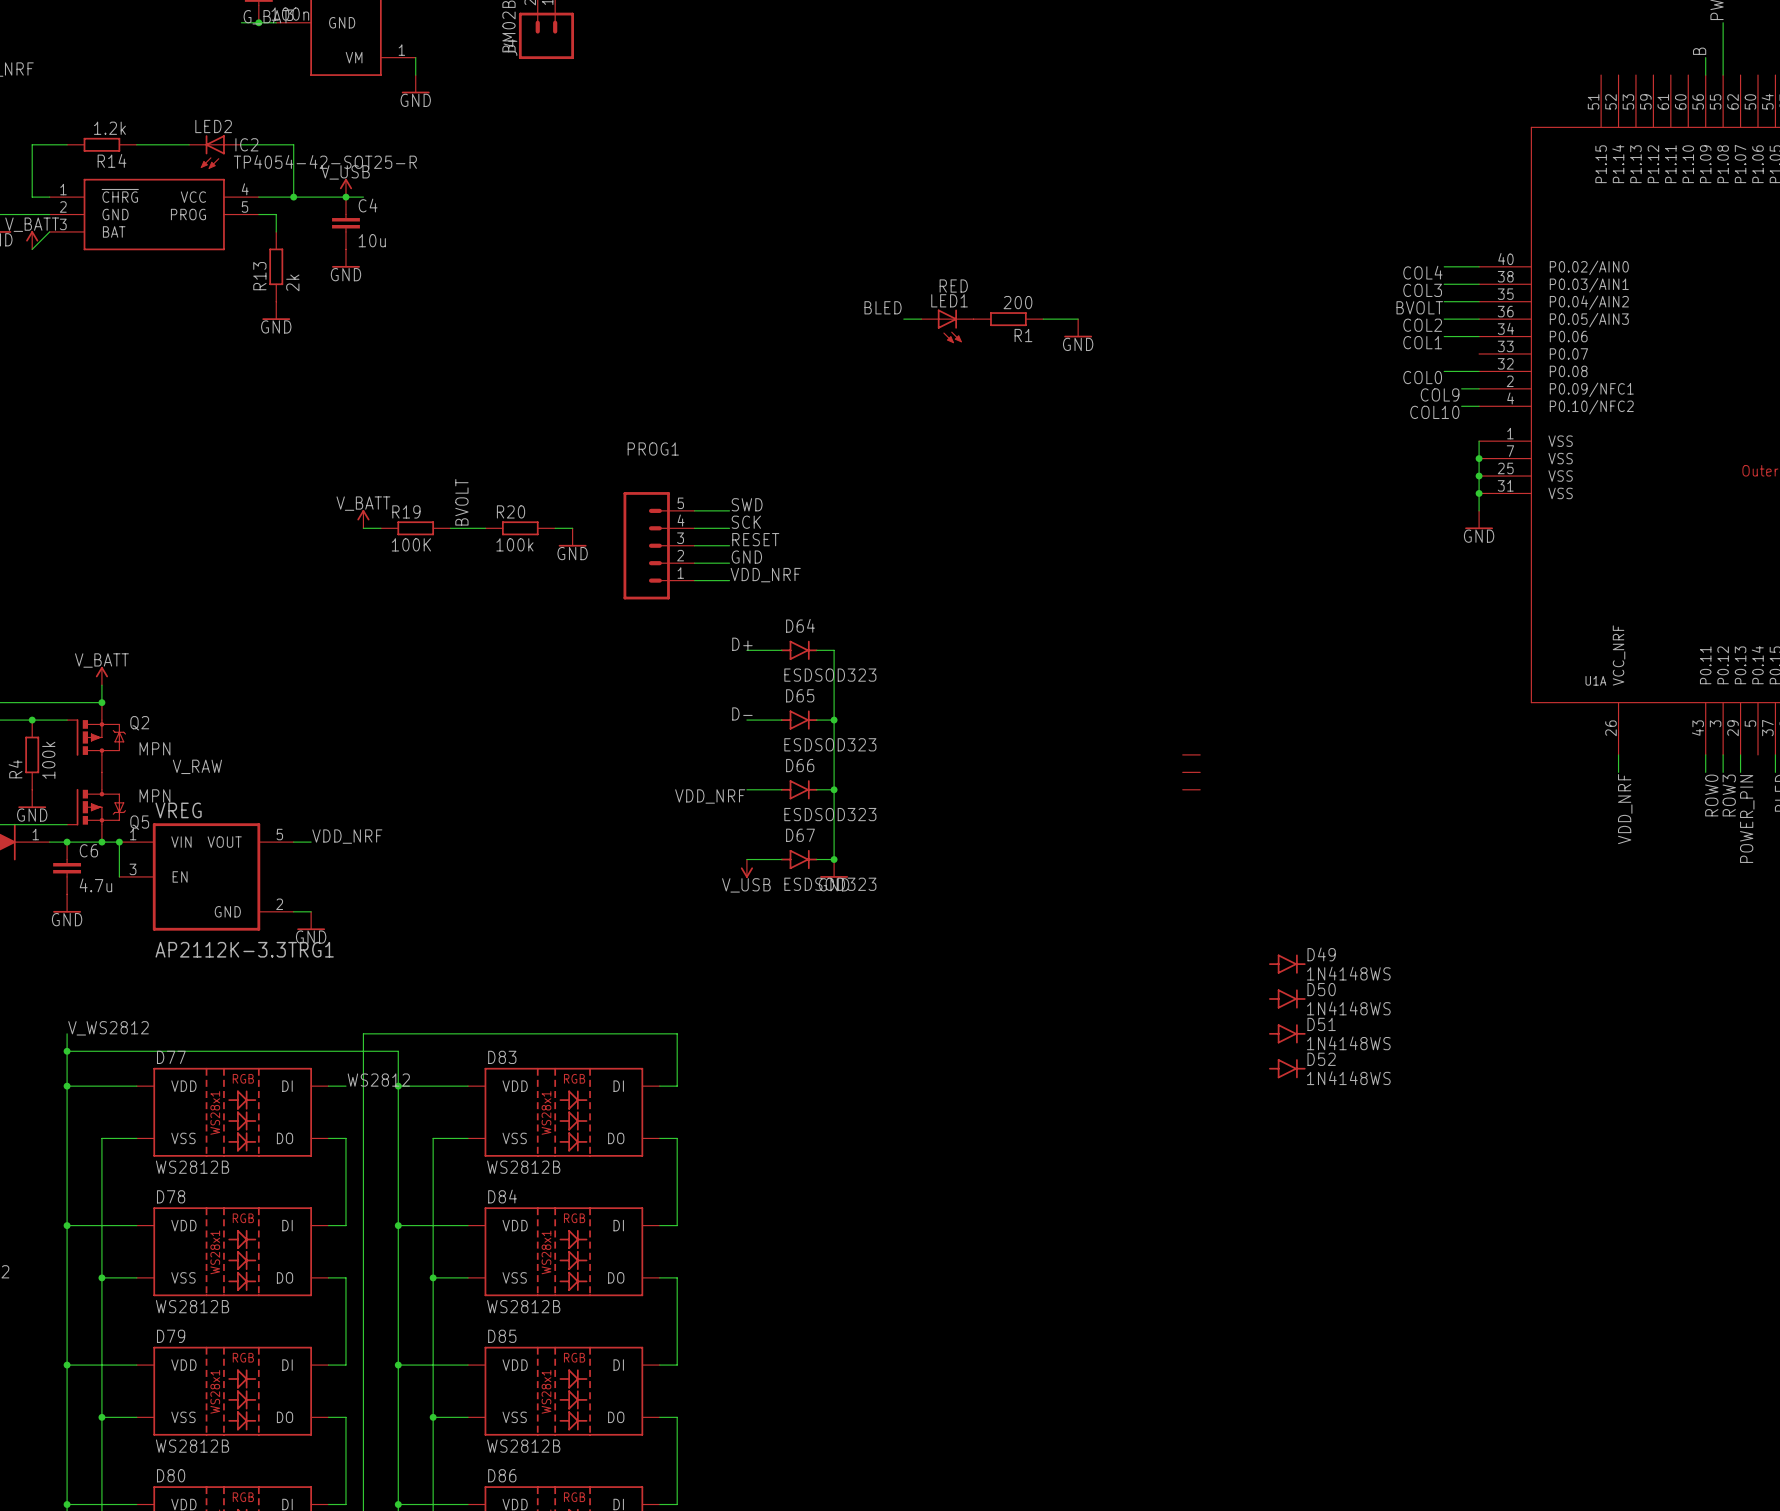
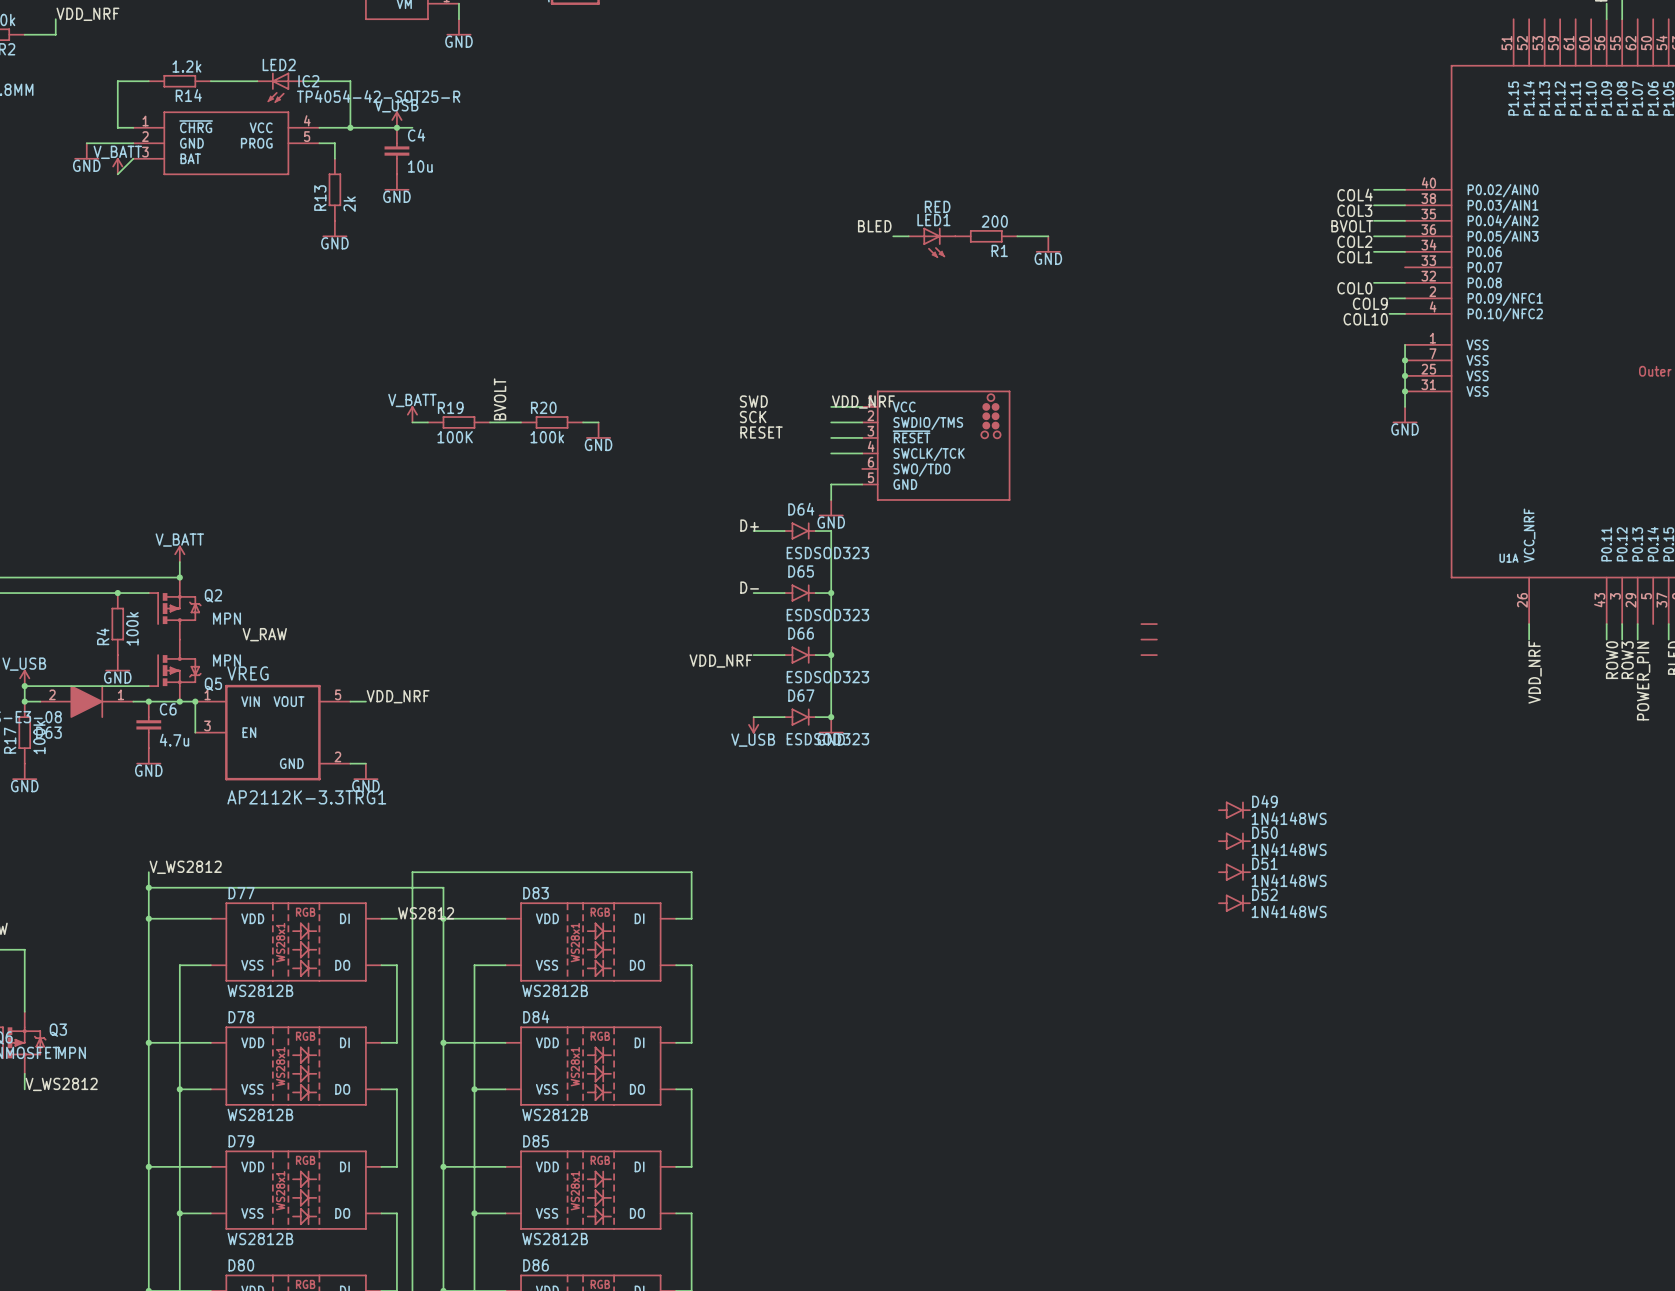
wire: (694, 510) (729, 510) -> (831, 406) (862, 406)
wire: (694, 528) (729, 528) -> (831, 422) (862, 422)
PROG1: (659, 545) -> none
wire: (694, 545) (729, 545) -> (831, 437) (862, 437)
part: none -> (936, 445)
label: GND (746, 557) -> none
wire: (694, 563) (729, 563) -> (831, 453) (862, 453)
label position: VDD_NRF (765, 575) -> VDD_NRF (863, 402)
wire: (694, 580) (729, 580) -> none
wire: none -> (862, 484) (831, 484) (831, 499)
power symbol: none -> GND (831, 508)

